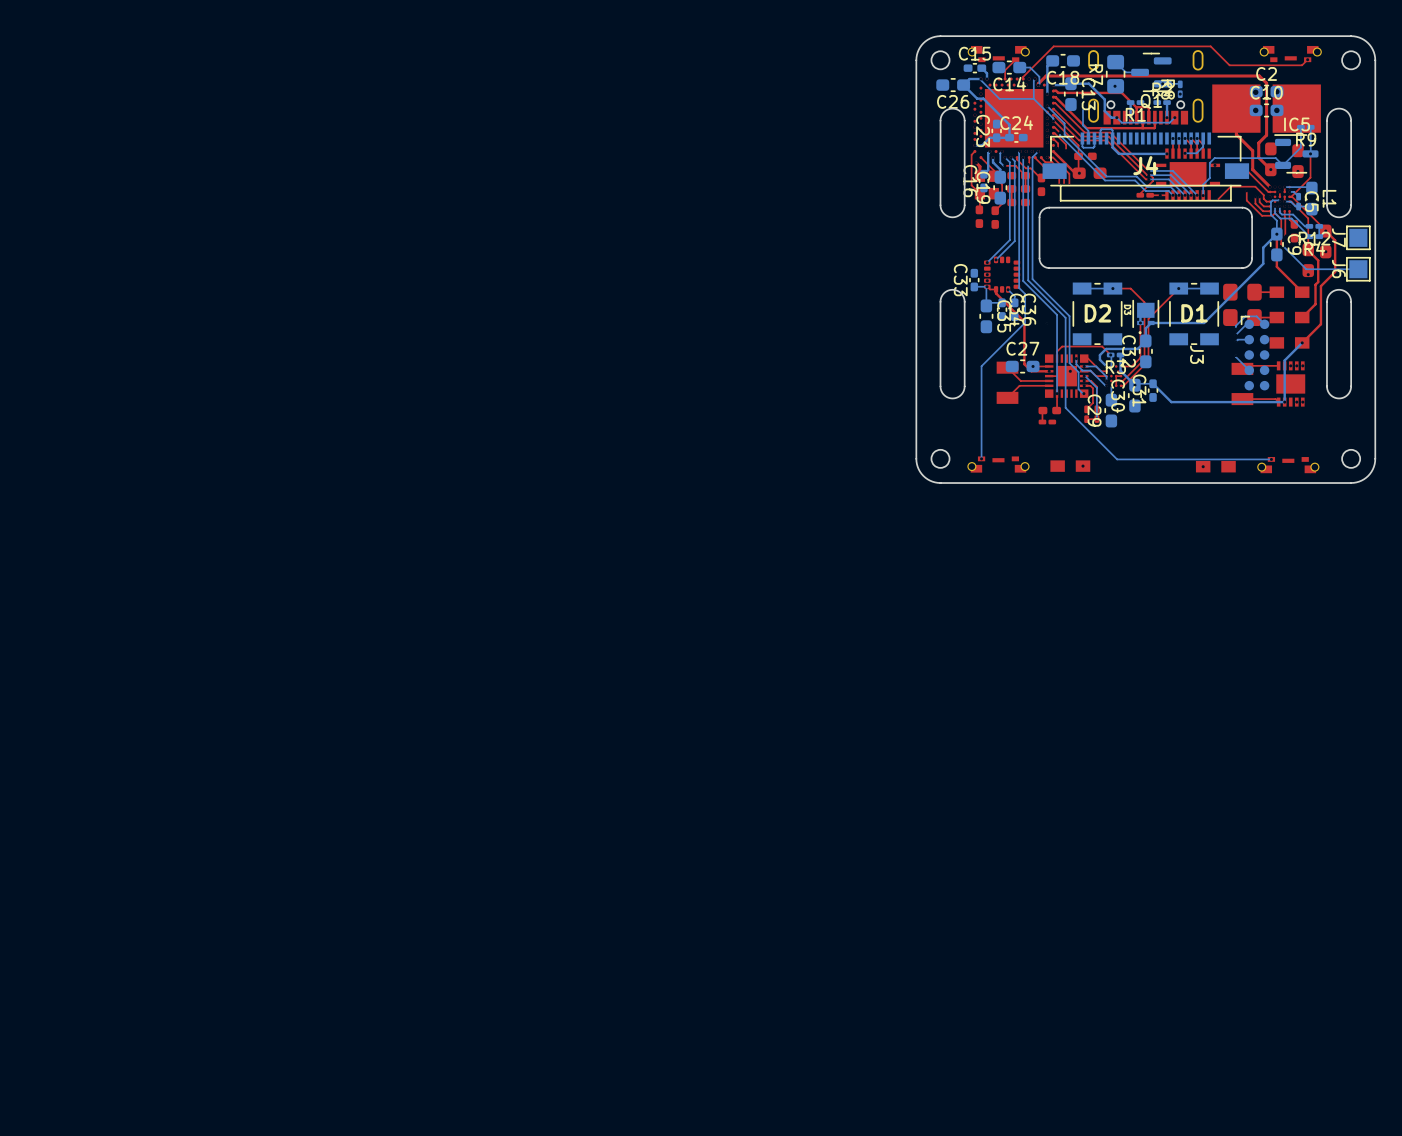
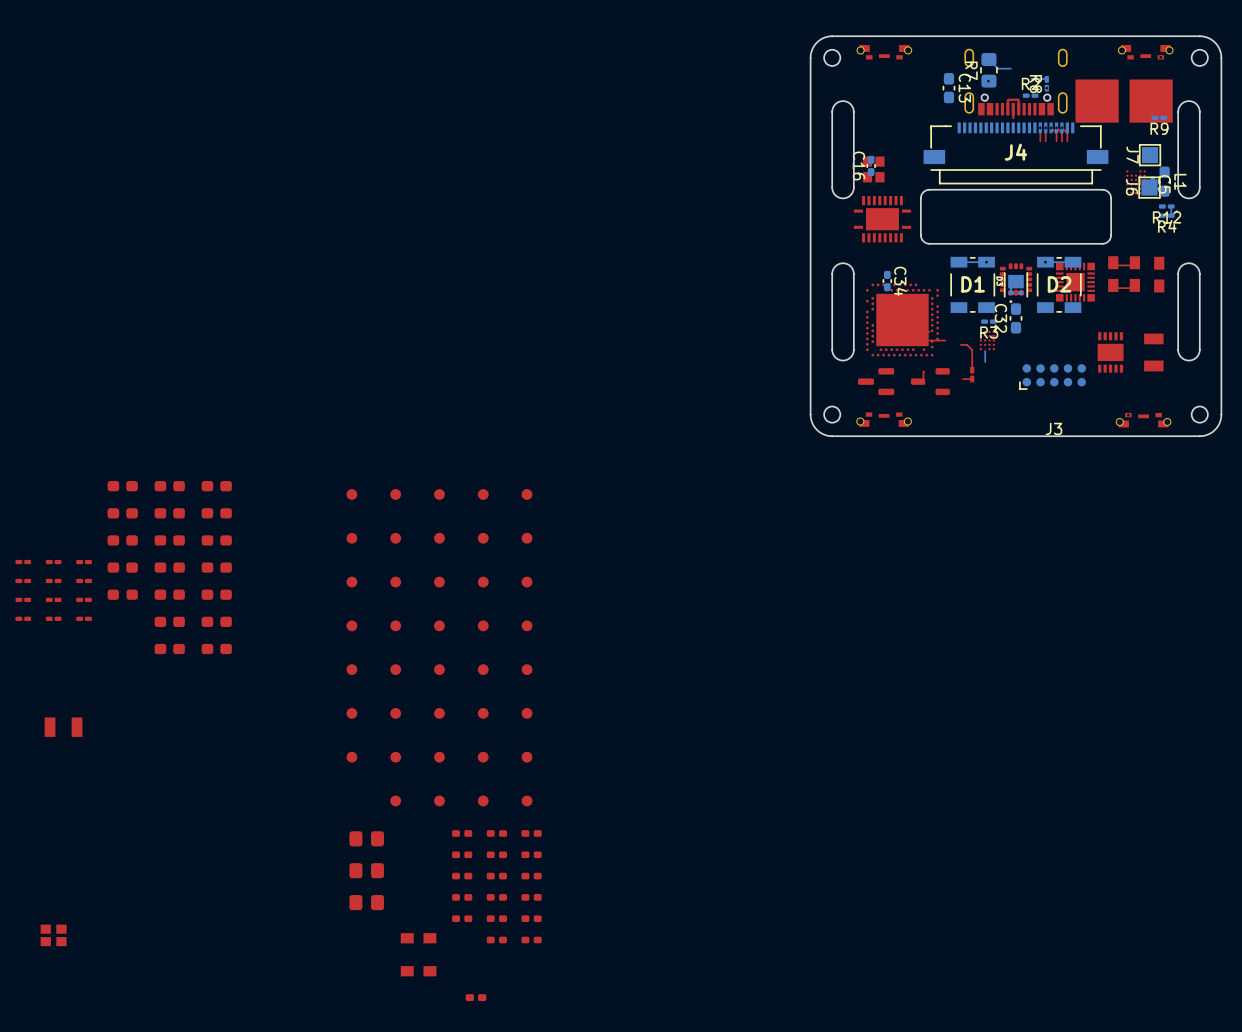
top track: (1015, 59) (1005, 70) (1005, 79) -> none
top track: (1307, 59) (1302, 65) (1229, 65) (1210, 46) (1053, 46) (1023, 79) -> none
bottom track: (1052, 60) (1047, 66) (1047, 94) -> none
C18: (1063, 60) -> none
C14: (1009, 67) -> none
bottom track: (1019, 67) (1030, 67) (1039, 76) (1038, 85) -> none
C15: (974, 68) -> none
bottom track: (981, 68) (986, 73) (986, 79) -> none
Q1: (1151, 72) -> none
via: (980, 79) -> none
via: (986, 79) -> none
bottom track: (1035, 79) (1033, 98) -> none
via: (1035, 79) -> none
via: (1162, 83) -> none
C26: (953, 85) -> none
via: (1020, 85) -> none
via: (1026, 85) -> none
top track: (1038, 85) (1046, 76) (1259, 76) (1266, 83) (1266, 135) (1258, 143) (1258, 157) (1270, 169) -> none
via: (1038, 85) -> none
bottom track: (1053, 85) (1088, 83) (1104, 99) (1104, 111) (1111, 117) (1116, 117) (1121, 122) (1169, 122) (1174, 117) -> none
via: (1053, 85) -> none
top track: (1053, 90) (1058, 92) (1121, 92) (1136, 107) -> none
C2: (1266, 91) -> none
via: (1276, 91) -> none
via: (1255, 92) -> none
via: (980, 94) -> none
via: (1047, 94) -> none
top track: (1053, 97) (1086, 128) (1154, 128) (1154, 117) -> none
bottom track: (1033, 98) (1053, 118) (1053, 121) -> none
bottom track: (1033, 98) (999, 98) (980, 79) (969, 79) (963, 85) (977, 98) (983, 98) (1009, 124) (1009, 137) (989, 137) (982, 145) (974, 145) -> none
bottom track: (1130, 102) (1130, 118) -> none
R1: (1135, 102) -> none
bottom track: (1167, 102) (1167, 117) -> none
top track: (1053, 103) (1084, 132) (1110, 132) (1148, 170) -> none
bottom track: (1047, 106) (1064, 123) (1064, 134) (1106, 176) (1136, 176) (1147, 187) (1170, 187) (1179, 195) -> none
via: (1047, 106) -> none
bottom track: (1083, 108) (1083, 125) (1088, 130) (1088, 138) -> none
top track: (1236, 108) (1236, 134) (1252, 150) (1252, 169) (1269, 186) -> none
top track: (1053, 109) (1081, 136) (1108, 136) (1147, 175) (1150, 175) (1152, 181) (1140, 195) -> none
via: (1255, 110) -> none
C10: (1266, 110) -> none
via: (1276, 110) -> none
top track: (1053, 115) (1079, 140) (1106, 140) (1145, 179) (1148, 179) -> none
via: (1116, 117) -> none
via: (1166, 117) -> none
via: (1174, 117) -> none
part rotation: 0° (1014, 118) -> 90° clockwise (902, 320)
part position: (1014, 118) -> (902, 320)
via: (1047, 118) -> none
via: (1130, 118) -> none
top track: (1053, 121) (1078, 145) (1079, 173) -> none
via: (1053, 121) -> none
via: (980, 124) -> none
via: (974, 127) -> none
top track: (1053, 127) (1060, 132) -> none
bottom track: (1300, 127) (1300, 147) (1283, 165) (1275, 158) (1214, 158) (1209, 162) (1209, 178) (1203, 184) (1203, 195) -> none
bottom track: (1310, 127) (1310, 153) -> none
C23: (996, 130) -> none
bottom track: (1060, 132) (1060, 135) (1105, 180) (1135, 180) (1145, 191) (1168, 191) (1172, 195) -> none
via: (1060, 132) -> none
top track: (1053, 133) (1066, 144) (1066, 150) -> none
C24: (1016, 137) -> none
bottom track: (1082, 138) (1083, 147) (1093, 147) (1094, 138) (1100, 138) (1100, 130) (1111, 129) (1112, 147) (1118, 153) (1166, 153) -> none
bottom track: (1203, 138) (1203, 146) (1196, 153) (1185, 153) -> none
top track: (1053, 139) (1058, 143) (1057, 148) -> none
via: (974, 145) -> none
via: (1057, 148) -> none
top track: (974, 151) (971, 154) (971, 185) (979, 193) (979, 209) -> none
bottom track: (990, 151) (988, 153) (988, 169) (983, 174) -> none
via: (990, 151) -> none
bottom track: (1002, 151) (1000, 162) (1004, 165) -> none
via: (1002, 151) -> none
bottom track: (1020, 151) (1019, 287) (1025, 294) (1025, 322) (981, 366) (981, 458) -> none
via: (1020, 151) -> none
via: (1032, 151) -> none
bottom track: (1038, 151) (1032, 157) (1032, 279) (1069, 316) (1069, 363) (1078, 372) (1078, 389) (1083, 393) -> none
via: (1038, 151) -> none
top track: (1053, 151) (1075, 173) (1079, 173) -> none
via: (1166, 153) -> none
via: (1185, 153) -> none
IC5: (1296, 153) -> none
top track: (1310, 153) (1310, 177) (1291, 196) -> none
via: (1310, 153) -> none
part: (1085, 156) -> none
top track: (980, 157) (993, 170) (993, 176) (1002, 184) (1002, 203) (995, 210) -> none
bottom track: (993, 157) (993, 162) (1000, 169) (1000, 177) -> none
via: (993, 157) -> none
bottom track: (1005, 157) (1009, 162) (1009, 240) (987, 262) -> none
bottom track: (1011, 157) (1014, 161) (1014, 241) (996, 259) -> none
via: (1011, 157) -> none
top track: (1017, 157) (1025, 168) (1030, 168) (1041, 177) -> none
bottom track: (1023, 157) (1023, 281) (1057, 314) (1057, 393) -> none
via: (1023, 157) -> none
top track: (1029, 157) (1028, 164) -> none
top track: (1035, 157) (1043, 166) (1050, 166) (1059, 174) (1059, 185) -> none
top track: (1041, 157) (1045, 162) (1052, 162) (1064, 174) (1064, 185) -> none
top track: (1047, 157) (1053, 157) (1069, 173) (1069, 185) -> none
via: (1047, 157) -> none
part: (1270, 159) -> none
part: (1297, 161) -> none
top track: (976, 162) (979, 166) (979, 176) -> none
via: (976, 162) -> none
bottom track: (1028, 164) (1028, 280) (1065, 317) (1065, 407) (1117, 459) (1271, 459) -> none
via: (1028, 164) -> none
top track: (1004, 165) (1015, 165) (1025, 175) (1025, 188) -> none
via: (1004, 165) -> none
via: (1214, 165) -> none
via: (1270, 169) -> none
bottom track: (1148, 170) (1172, 170) (1197, 195) -> none
via: (1148, 170) -> none
via: (1297, 171) -> none
top track: (1243, 172) (1248, 172) (1268, 191) (1275, 191) -> none
via: (1079, 173) -> none
part: (1089, 173) -> none
part position: (1188, 174) -> (882, 219)
part: (1018, 175) -> none
bottom track: (1148, 175) (1171, 175) (1191, 195) -> none
via: (1148, 175) -> none
bottom track: (1148, 179) (1168, 179) (1185, 195) -> none
via: (1148, 179) -> none
part: (1041, 184) -> none
C19: (1000, 187) -> none
via: (1270, 187) -> none
top track: (1284, 187) (1284, 191) -> none
bottom track: (1284, 187) (1311, 188) -> none
via: (1284, 187) -> none
top track: (1011, 188) (1011, 202) -> none
part: (1018, 188) -> none
top track: (1246, 190) (1246, 200) (1262, 215) (1272, 215) (1275, 213) -> none
top track: (1279, 191) (1279, 196) -> none
via: (1279, 191) -> none
bottom track: (1289, 191) (1293, 191) (1298, 196) -> none
via: (1289, 191) -> none
part: (1145, 195) -> none
via: (1160, 195) -> none
top track: (1166, 195) (1150, 195) -> none
via: (1172, 195) -> none
via: (1179, 195) -> none
via: (1185, 195) -> none
via: (1191, 195) -> none
via: (1197, 195) -> none
via: (1203, 195) -> none
top track: (1255, 196) (1255, 203) (1263, 211) (1270, 211) -> none
top track: (1259, 196) (1259, 202) (1263, 206) (1270, 206) -> none
via: (1270, 196) -> none
top track: (1289, 196) (1292, 196) (1335, 240) (1335, 271) (1320, 286) (1320, 324) (1302, 342) -> none
top track: (1216, 200) (1230, 186) (1255, 186) (1263, 195) (1263, 198) (1270, 201) -> none
bottom track: (1279, 201) (1272, 200) (1270, 202) (1270, 214) (1276, 220) (1276, 234) -> none
via: (1279, 201) -> none
bottom track: (1284, 201) (1290, 201) (1295, 206) (1298, 206) -> none
via: (1284, 201) -> none
top track: (1289, 201) (1308, 218) (1308, 250) (1318, 260) (1315, 304) (1302, 317) -> none
part: (1018, 202) -> none
bottom track: (1275, 206) (1275, 213) (1280, 218) (1291, 218) (1309, 236) -> none
via: (1275, 206) -> none
bottom track: (1279, 206) (1279, 212) (1281, 214) (1293, 214) (1304, 226) (1309, 226) -> none
via: (1279, 206) -> none
via: (1284, 206) -> none
via: (1289, 206) -> none
top track: (1284, 211) (1285, 236) -> none
top track: (1289, 211) (1289, 219) (1294, 224) -> none
top track: (1275, 213) (1281, 219) (1281, 244) (1283, 246) -> none
part: (979, 216) -> none
part: (995, 217) -> none
part: (1294, 231) -> none
via: (1325, 231) -> none
top track: (1276, 234) (1276, 266) (1302, 292) -> none
bottom track: (1276, 234) (1263, 247) (1263, 263) (1204, 322) (1151, 322) (1145, 328) (1145, 340) (1137, 348) (1106, 348) (1099, 355) (1099, 359) (1106, 366) -> none
via: (1276, 234) -> none
via: (1285, 236) -> none
J7 position: (1358, 237) -> (1150, 155)
part: (1325, 241) -> none
C9: (1276, 244) -> none
bottom track: (1283, 246) (1306, 269) (1358, 269) -> none
via: (1325, 251) -> none
via: (996, 259) -> none
part: (1308, 260) -> none
via: (987, 262) -> none
J6 position: (1358, 269) -> (1149, 187)
via: (987, 274) -> none
part position: (1002, 274) -> (1015, 279)
via: (1308, 274) -> none
C33: (974, 280) -> none
via: (987, 280) -> none
bottom track: (974, 286) (986, 286) (986, 305) (989, 302) (1002, 302) -> none
via: (986, 286) -> none
top track: (987, 286) (990, 289) (996, 289) (996, 293) (1024, 321) (1024, 364) (1031, 371) (1049, 371) -> none
top track: (1112, 288) (1130, 288) (1144, 302) (1144, 359) (1121, 380) -> none
top track: (1178, 288) (1148, 318) (1148, 360) (1123, 385) (1121, 385) -> none
bottom track: (1008, 289) (1014, 296) (1014, 302) -> none
via: (1008, 289) -> none
part: (1242, 292) -> none
part: (1289, 292) -> none
part: none -> (1113, 274)
part: none -> (1134, 274)
part: none -> (1159, 274)
C36: (1014, 309) -> none
D2 name: D2 (1097, 313) -> D1 (973, 284)
D1 name: D1 (1194, 313) -> D2 (1059, 284)
C35: (986, 316) -> none
part: (1242, 317) -> none
part: (1289, 317) -> none
top track: (1140, 322) (1140, 357) (1131, 366) (1121, 366) -> none
via: (1140, 322) -> none
bottom track: (1249, 324) (1246, 324) (1235, 335) -> none
bottom track: (1264, 324) (1256, 316) (1245, 316) (1235, 325) (1235, 329) -> none
bottom track: (1249, 339) (1237, 339) (1235, 341) -> none
part: (1289, 342) -> none
bottom track: (1302, 342) (1284, 360) (1284, 402) (1171, 402) (1153, 383) (1134, 385) (1120, 370) (1120, 354) -> none
via: (1302, 342) -> none
J3 rotation: 0° (1255, 353) -> 90° counterclockwise (1052, 376)
J3 position: (1255, 353) -> (1052, 376)
top track: (1110, 354) (1102, 346) (1062, 346) (1057, 351) (1057, 358) -> none
bottom track: (1110, 354) (1111, 371) -> none
via: (1110, 354) -> none
bottom track: (1235, 355) (1249, 370) -> none
bottom track: (1076, 358) (1076, 364) (1082, 370) (1090, 370) (1106, 385) -> none
via: (1076, 358) -> none
top track: (1084, 358) (1088, 358) (1100, 371) (1106, 371) -> none
part footprint: [1276, 361, 1306, 407] -> [1144, 333, 1164, 372]
part footprint: [1231, 362, 1254, 406] -> [1097, 332, 1124, 373]
top track: (1278, 365) (1245, 365) (1242, 368) -> none
via: (1290, 365) -> none
via: (1296, 365) -> none
via: (1302, 365) -> none
C27: (1022, 366) -> none
via: (1033, 366) -> none
bottom track: (1084, 366) (1096, 366) (1106, 376) (1106, 380) -> none
via: (1084, 366) -> none
top track: (1007, 367) (1020, 380) (1049, 380) -> none
via: (1049, 371) -> none
via: (1070, 371) -> none
top track: (1084, 371) (1091, 371) (1096, 376) (1106, 376) -> none
via: (1116, 371) -> none
part position: (1066, 376) -> (1075, 282)
bottom track: (1084, 376) (1096, 387) (1096, 419) -> none
via: (1084, 376) -> none
top track: (1121, 376) (1116, 376) (1116, 385) -> none
via: (1084, 380) -> none
via: (1106, 380) -> none
part: (1007, 382) -> none
top track: (1049, 385) (1019, 385) (1007, 397) -> none
top track: (1084, 385) (1090, 385) (1092, 388) (1092, 403) (1086, 409) -> none
via: (1084, 385) -> none
via: (1106, 385) -> none
via: (1134, 385) -> none
C31: (1153, 390) -> none
top track: (1057, 393) (1056, 410) -> none
via: (1057, 393) -> none
via: (1083, 393) -> none
C30: (1134, 395) -> none
top track: (1242, 399) (1275, 399) (1278, 402) -> none
via: (1284, 402) -> none
via: (1296, 402) -> none
via: (1302, 402) -> none
part: (1049, 410) -> none
C29: (1111, 410) -> none
part: (1086, 414) -> none
part footprint: [1038, 419, 1057, 425] -> [910, 368, 950, 396]
part: none -> (876, 381)
via: (981, 458) -> none
part: (1070, 466) -> none
via: (1083, 466) -> none
via: (1203, 466) -> none
part: (1215, 466) -> none
part: none -> (122, 486)
part: none -> (169, 486)
part: none -> (216, 486)
part: none -> (351, 494)
part: none -> (395, 494)
part: none -> (439, 494)
part: none -> (483, 494)
part: none -> (527, 494)
part: none -> (122, 513)
part: none -> (169, 513)
part: none -> (216, 513)
part: none -> (351, 538)
part: none -> (395, 538)
part: none -> (439, 538)
part: none -> (483, 538)
part: none -> (527, 538)
part: none -> (122, 540)
part: none -> (169, 540)
part: none -> (216, 540)
part: none -> (23, 562)
part: none -> (53, 562)
part: none -> (84, 562)
part: none -> (122, 567)
part: none -> (169, 567)
part: none -> (216, 567)
part: none -> (23, 580)
part: none -> (53, 580)
part: none -> (84, 580)
part: none -> (351, 582)
part: none -> (395, 582)
part: none -> (439, 582)
part: none -> (483, 582)
part: none -> (527, 582)
part: none -> (122, 594)
part: none -> (169, 594)
part: none -> (216, 594)
part: none -> (23, 599)
part: none -> (53, 599)
part: none -> (84, 599)
part: none -> (23, 618)
part: none -> (53, 618)
part: none -> (84, 618)
part: none -> (169, 621)
part: none -> (216, 621)
part: none -> (351, 625)
part: none -> (395, 625)
part: none -> (439, 625)
part: none -> (483, 625)
part: none -> (527, 625)
part: none -> (169, 648)
part: none -> (216, 648)
part: none -> (351, 669)
part: none -> (395, 669)
part: none -> (439, 669)
part: none -> (483, 669)
part: none -> (527, 669)
part: none -> (351, 713)
part: none -> (395, 713)
part: none -> (439, 713)
part: none -> (483, 713)
part: none -> (527, 713)
part: none -> (63, 727)
part: none -> (351, 757)
part: none -> (395, 757)
part: none -> (439, 757)
part: none -> (483, 757)
part: none -> (527, 757)
part: none -> (395, 800)
part: none -> (439, 800)
part: none -> (483, 800)
part: none -> (527, 800)
part: none -> (462, 833)
part: none -> (496, 833)
part: none -> (531, 833)
part: none -> (366, 838)
part: none -> (462, 854)
part: none -> (496, 854)
part: none -> (531, 854)
part: none -> (366, 870)
part: none -> (462, 876)
part: none -> (496, 876)
part: none -> (531, 876)
part: none -> (462, 897)
part: none -> (496, 897)
part: none -> (531, 897)
part: none -> (366, 902)
part: none -> (462, 918)
part: none -> (496, 918)
part: none -> (531, 918)
part: none -> (53, 935)
part: none -> (418, 938)
part: none -> (496, 939)
part: none -> (531, 939)
part: none -> (418, 971)
part: none -> (476, 997)

